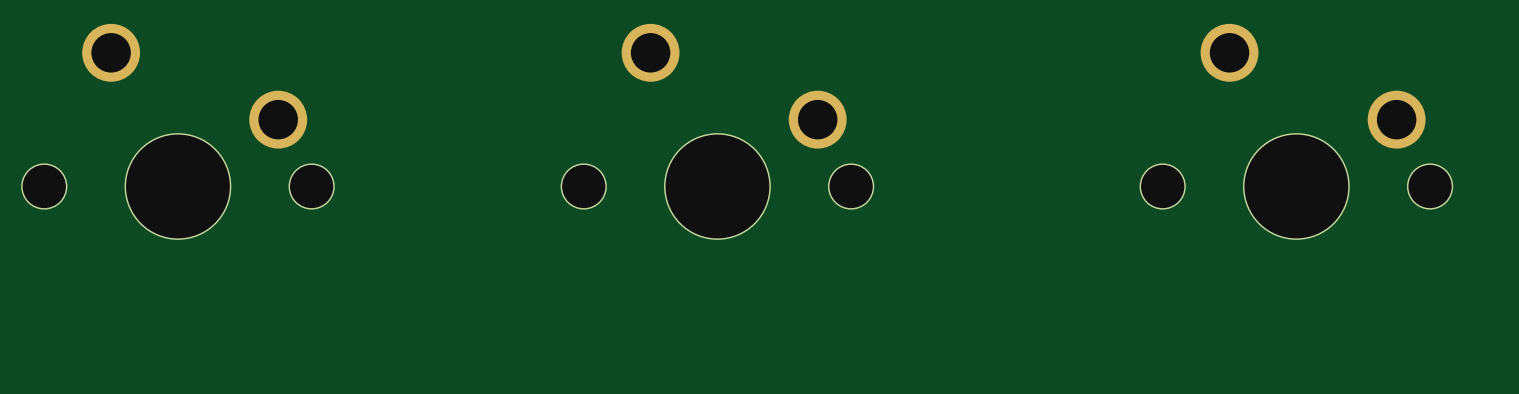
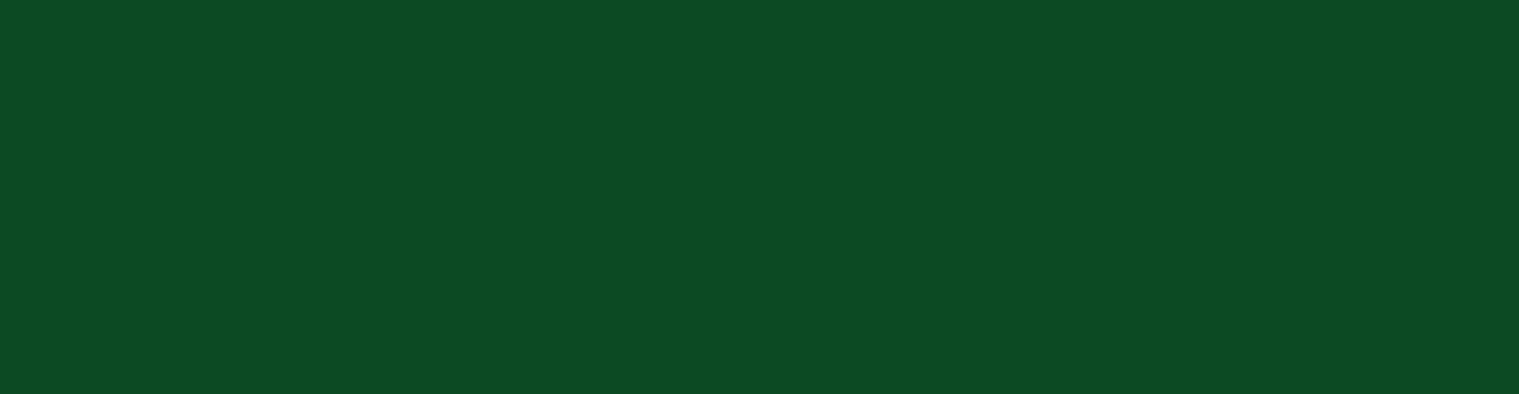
part: (177, 131) -> none
part: (717, 131) -> none
part: (1296, 131) -> none

